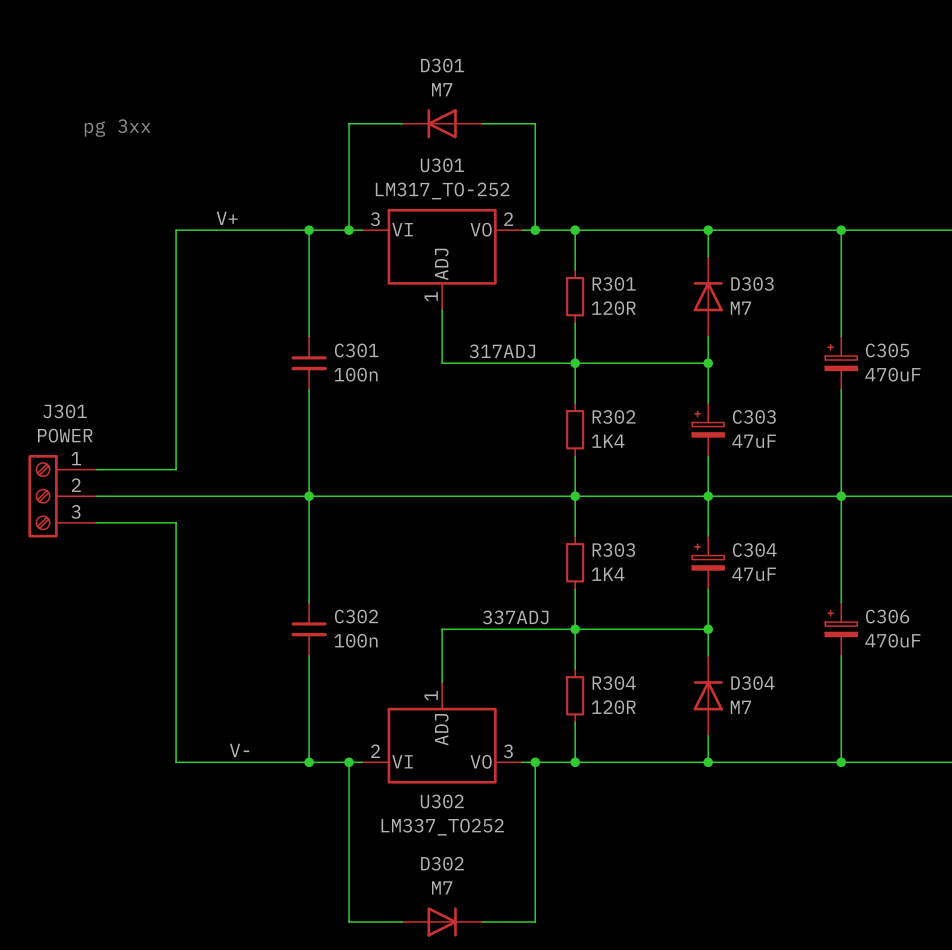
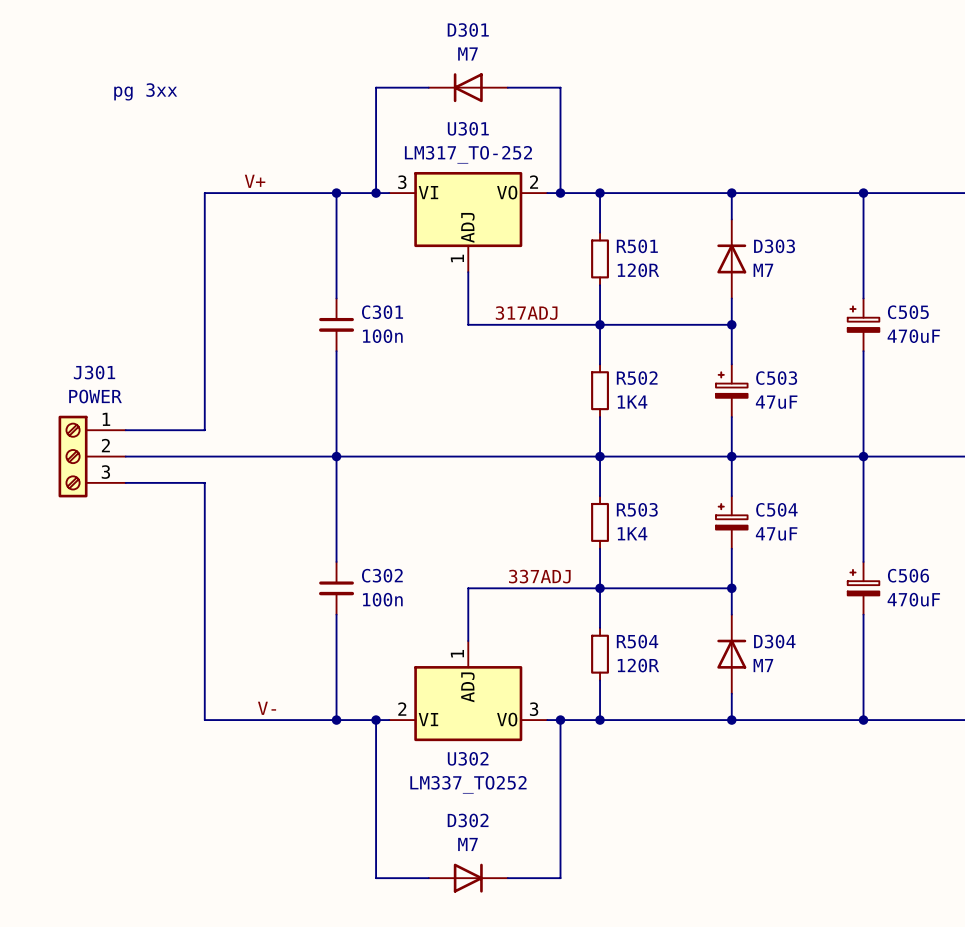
R301 name: R301 (614, 283) -> R501 (637, 246)
C305 name: C305 (887, 350) -> C505 (908, 312)
R302 name: R302 (614, 417) -> R502 (637, 378)
C303 name: C303 (754, 417) -> C503 (776, 378)
R303 name: R303 (613, 550) -> R503 (637, 509)
C304 name: C304 (754, 550) -> C504 (776, 509)
C306 name: C306 (887, 616) -> C506 (908, 575)
R304 name: R304 (614, 683) -> R504 (637, 641)

